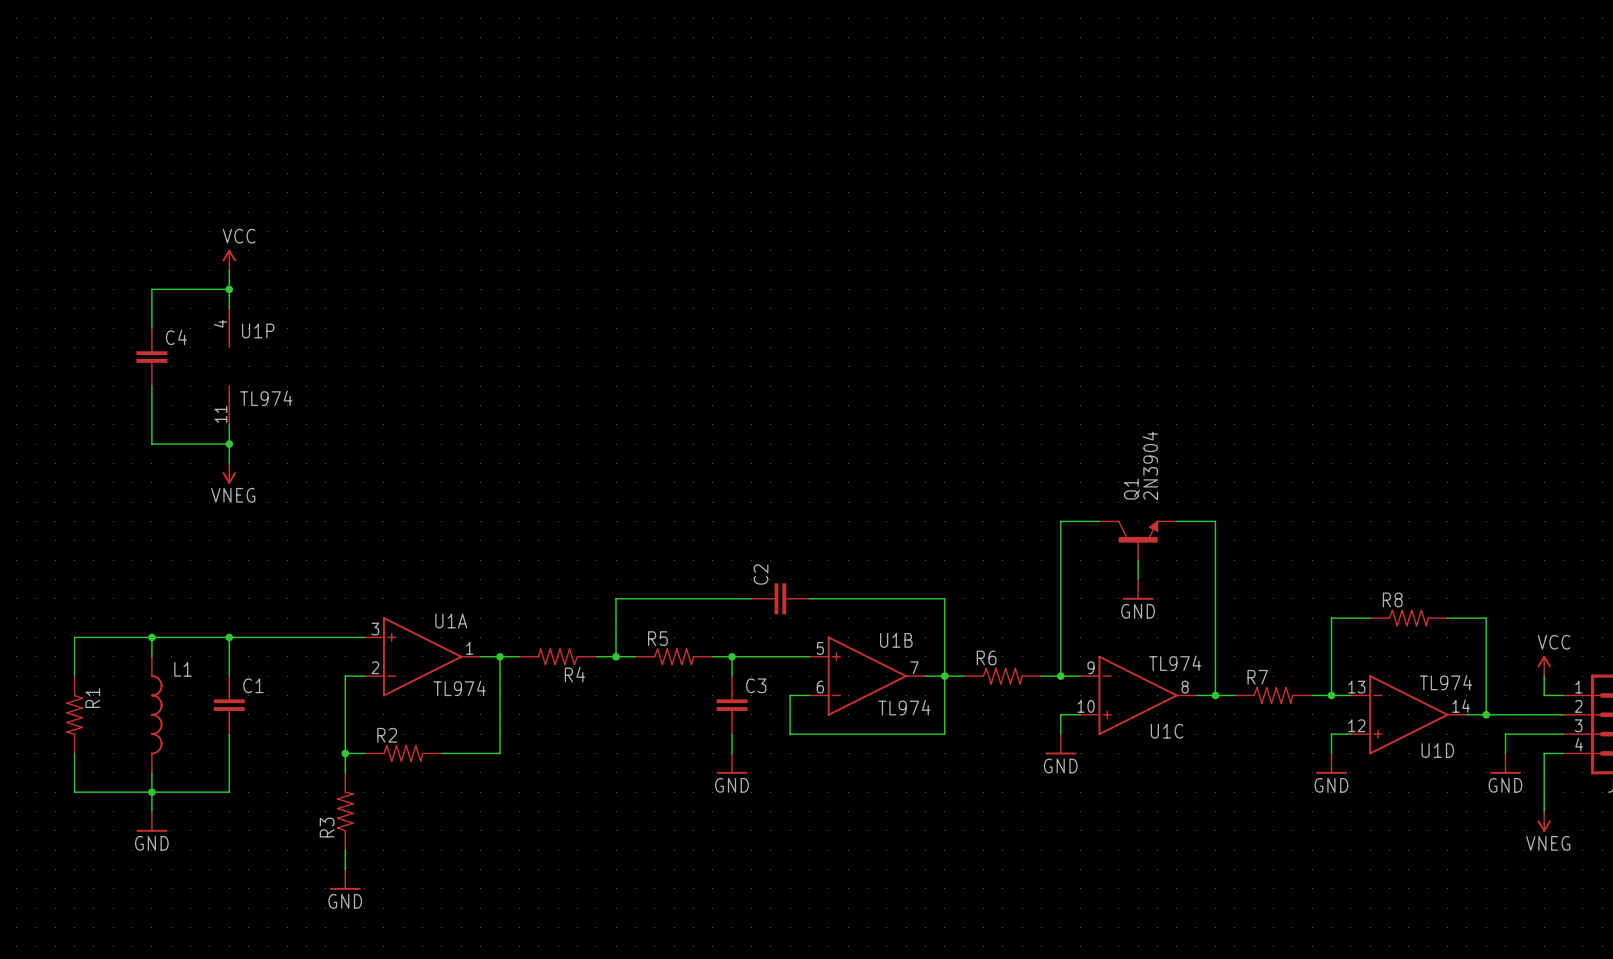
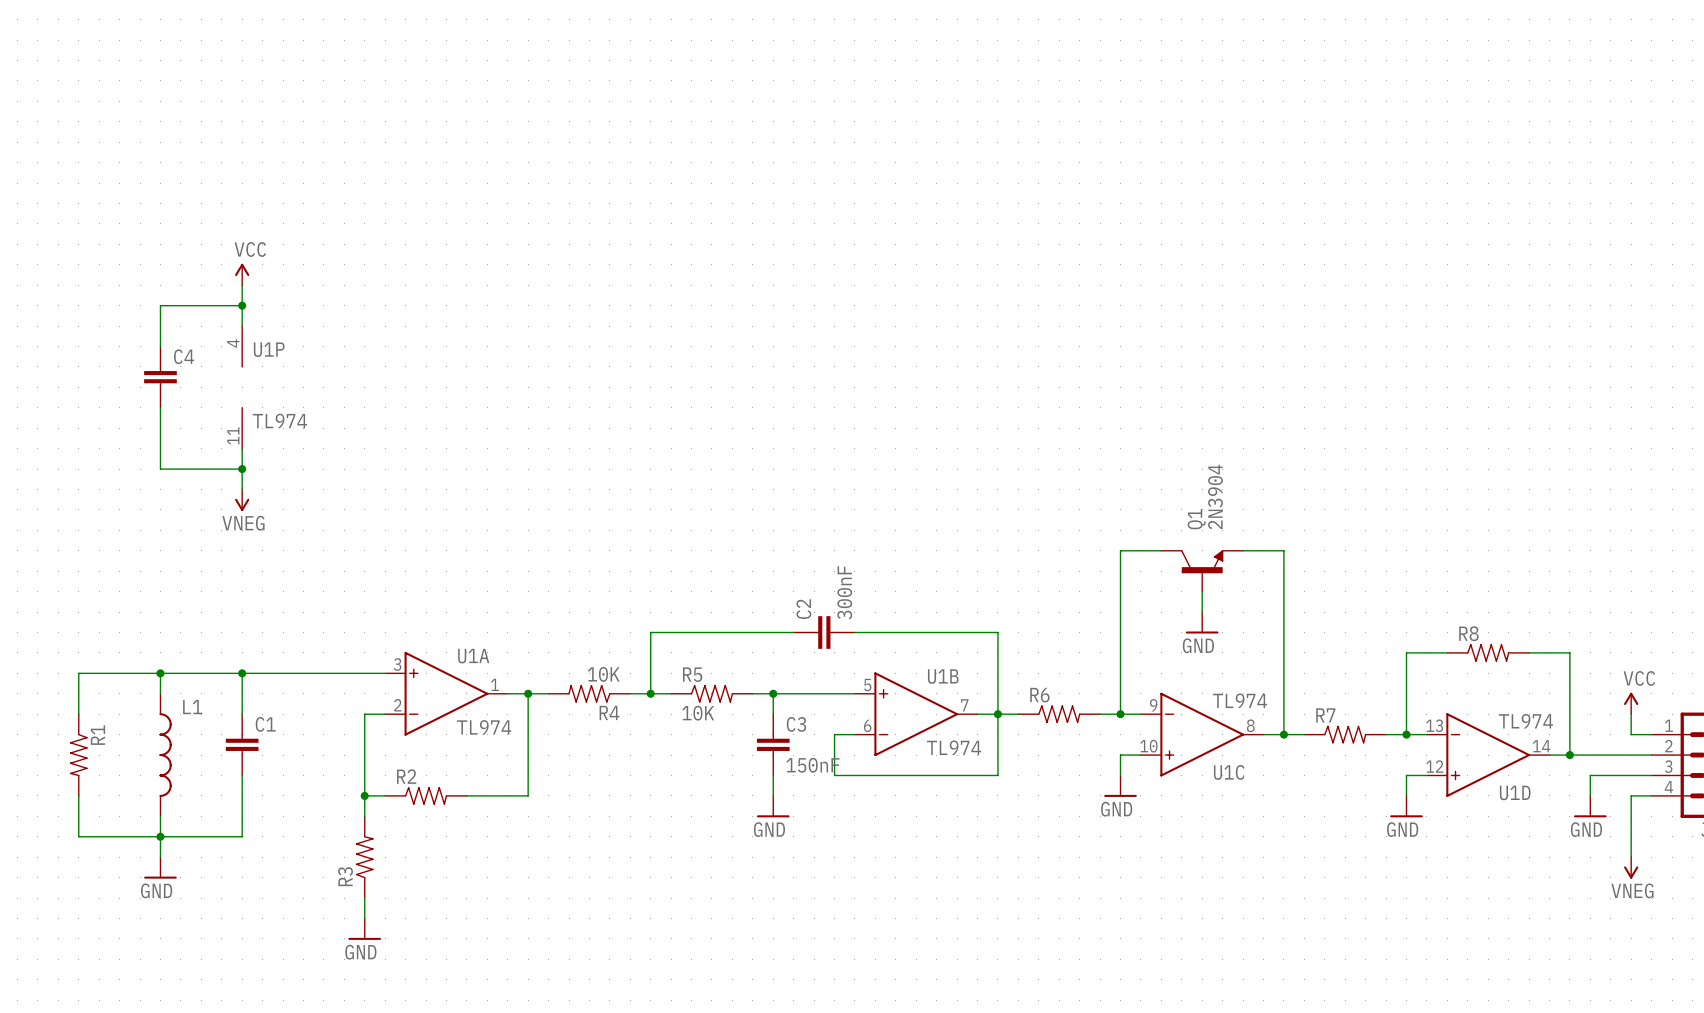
C2 value: none -> 300nF (844, 592)
R4 value: none -> 10K (603, 674)
R5 value: none -> 10K (698, 713)
C3 value: none -> 150nF (813, 765)

